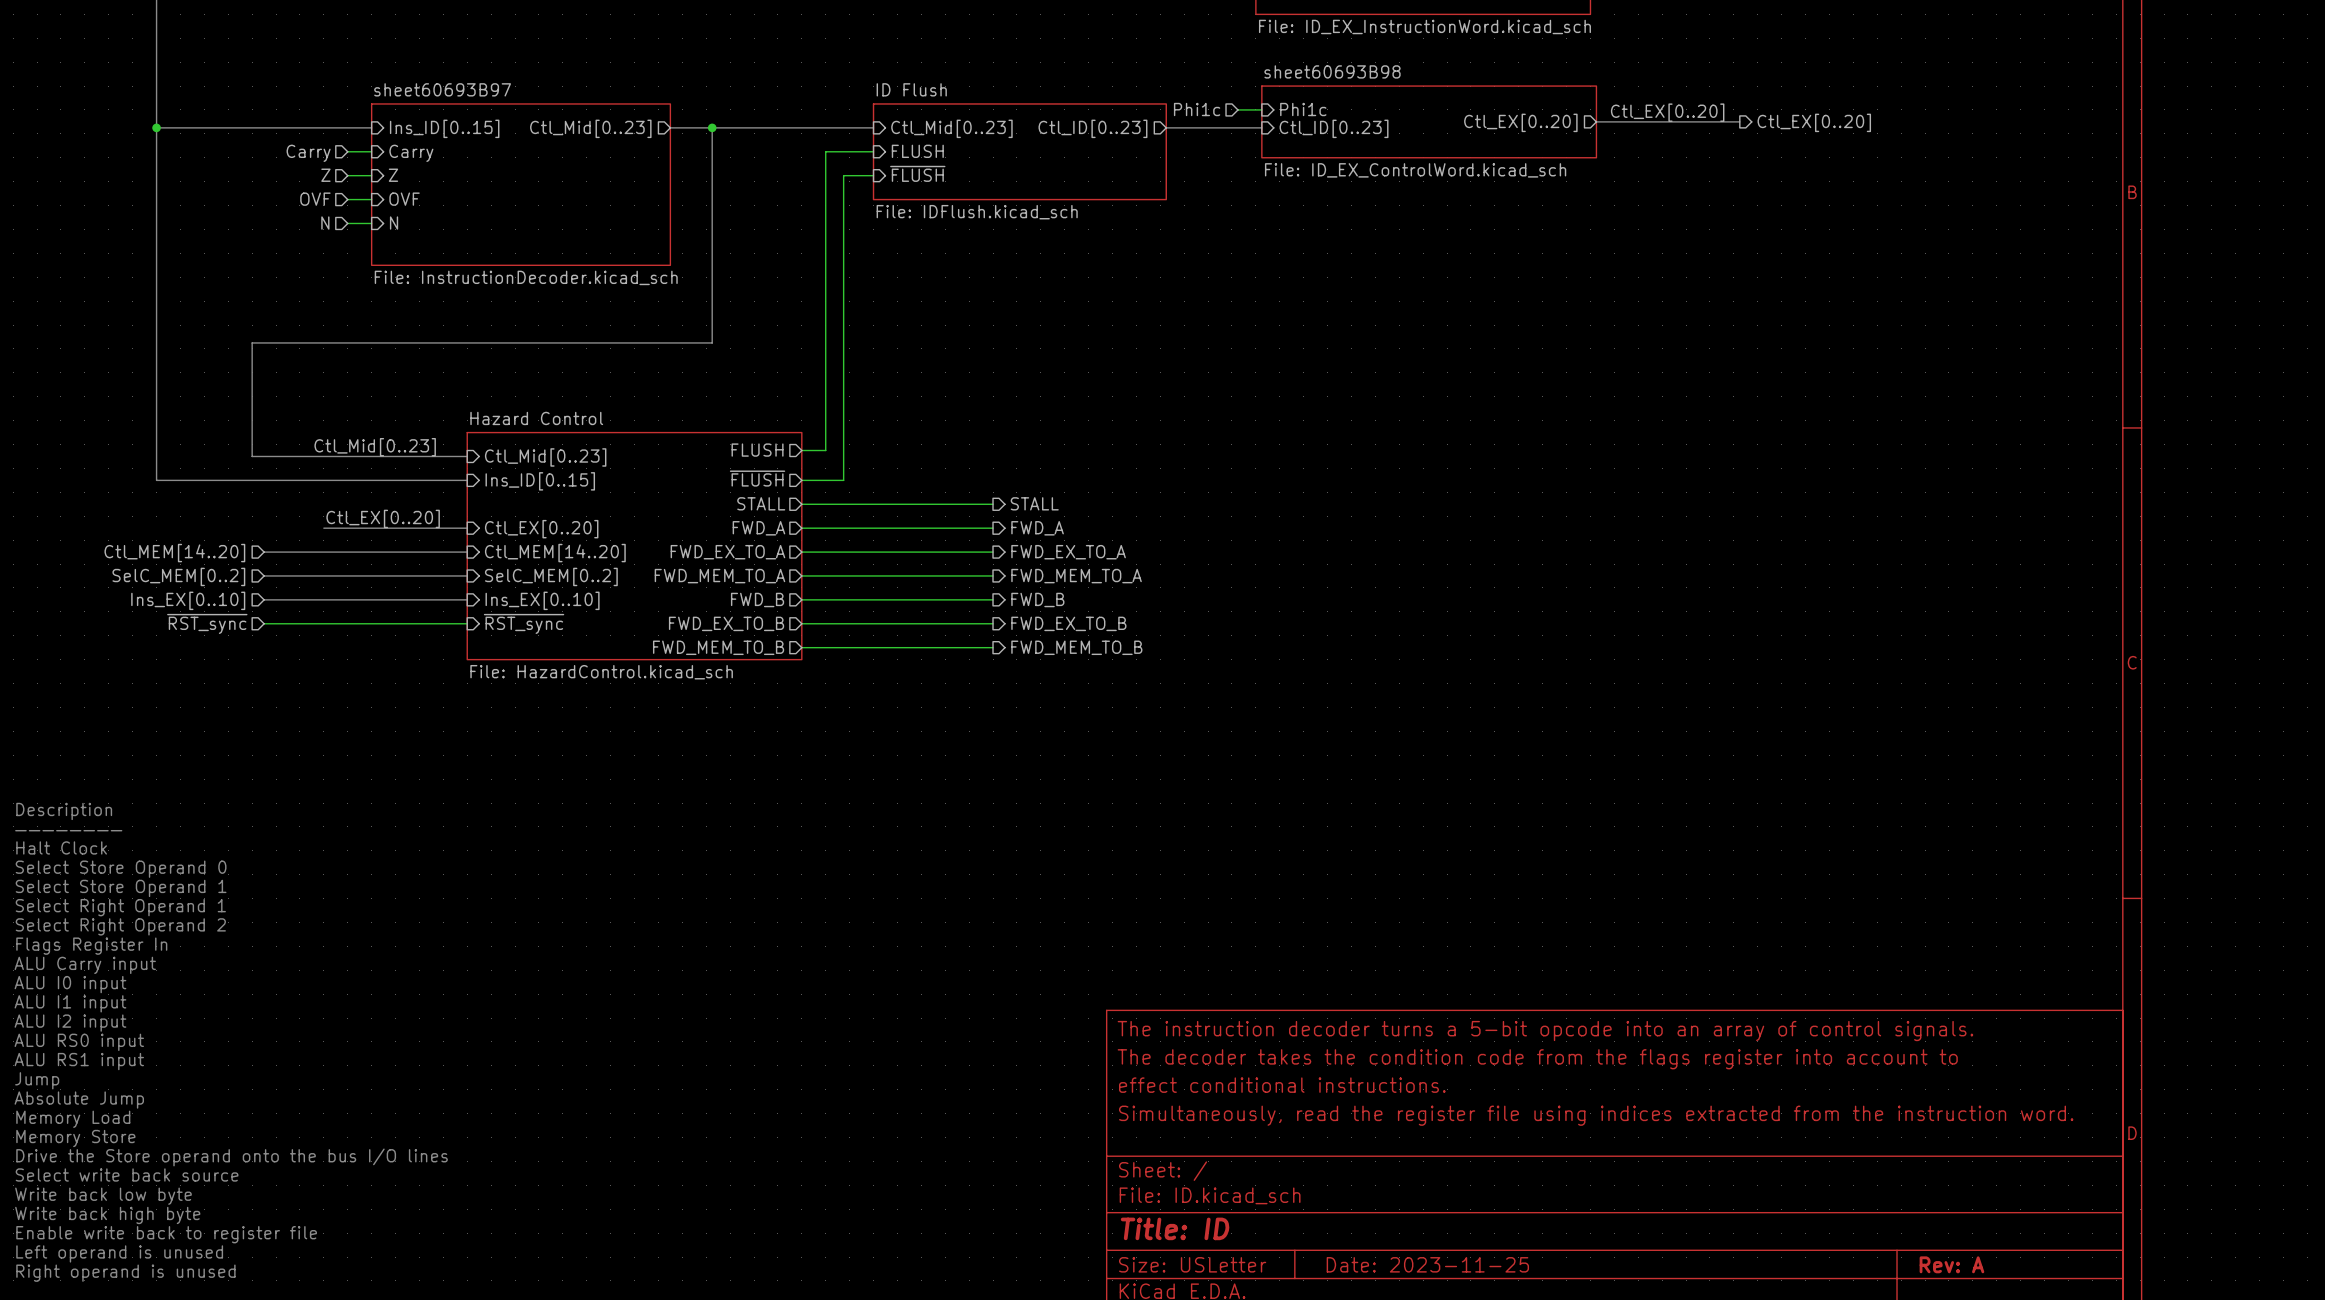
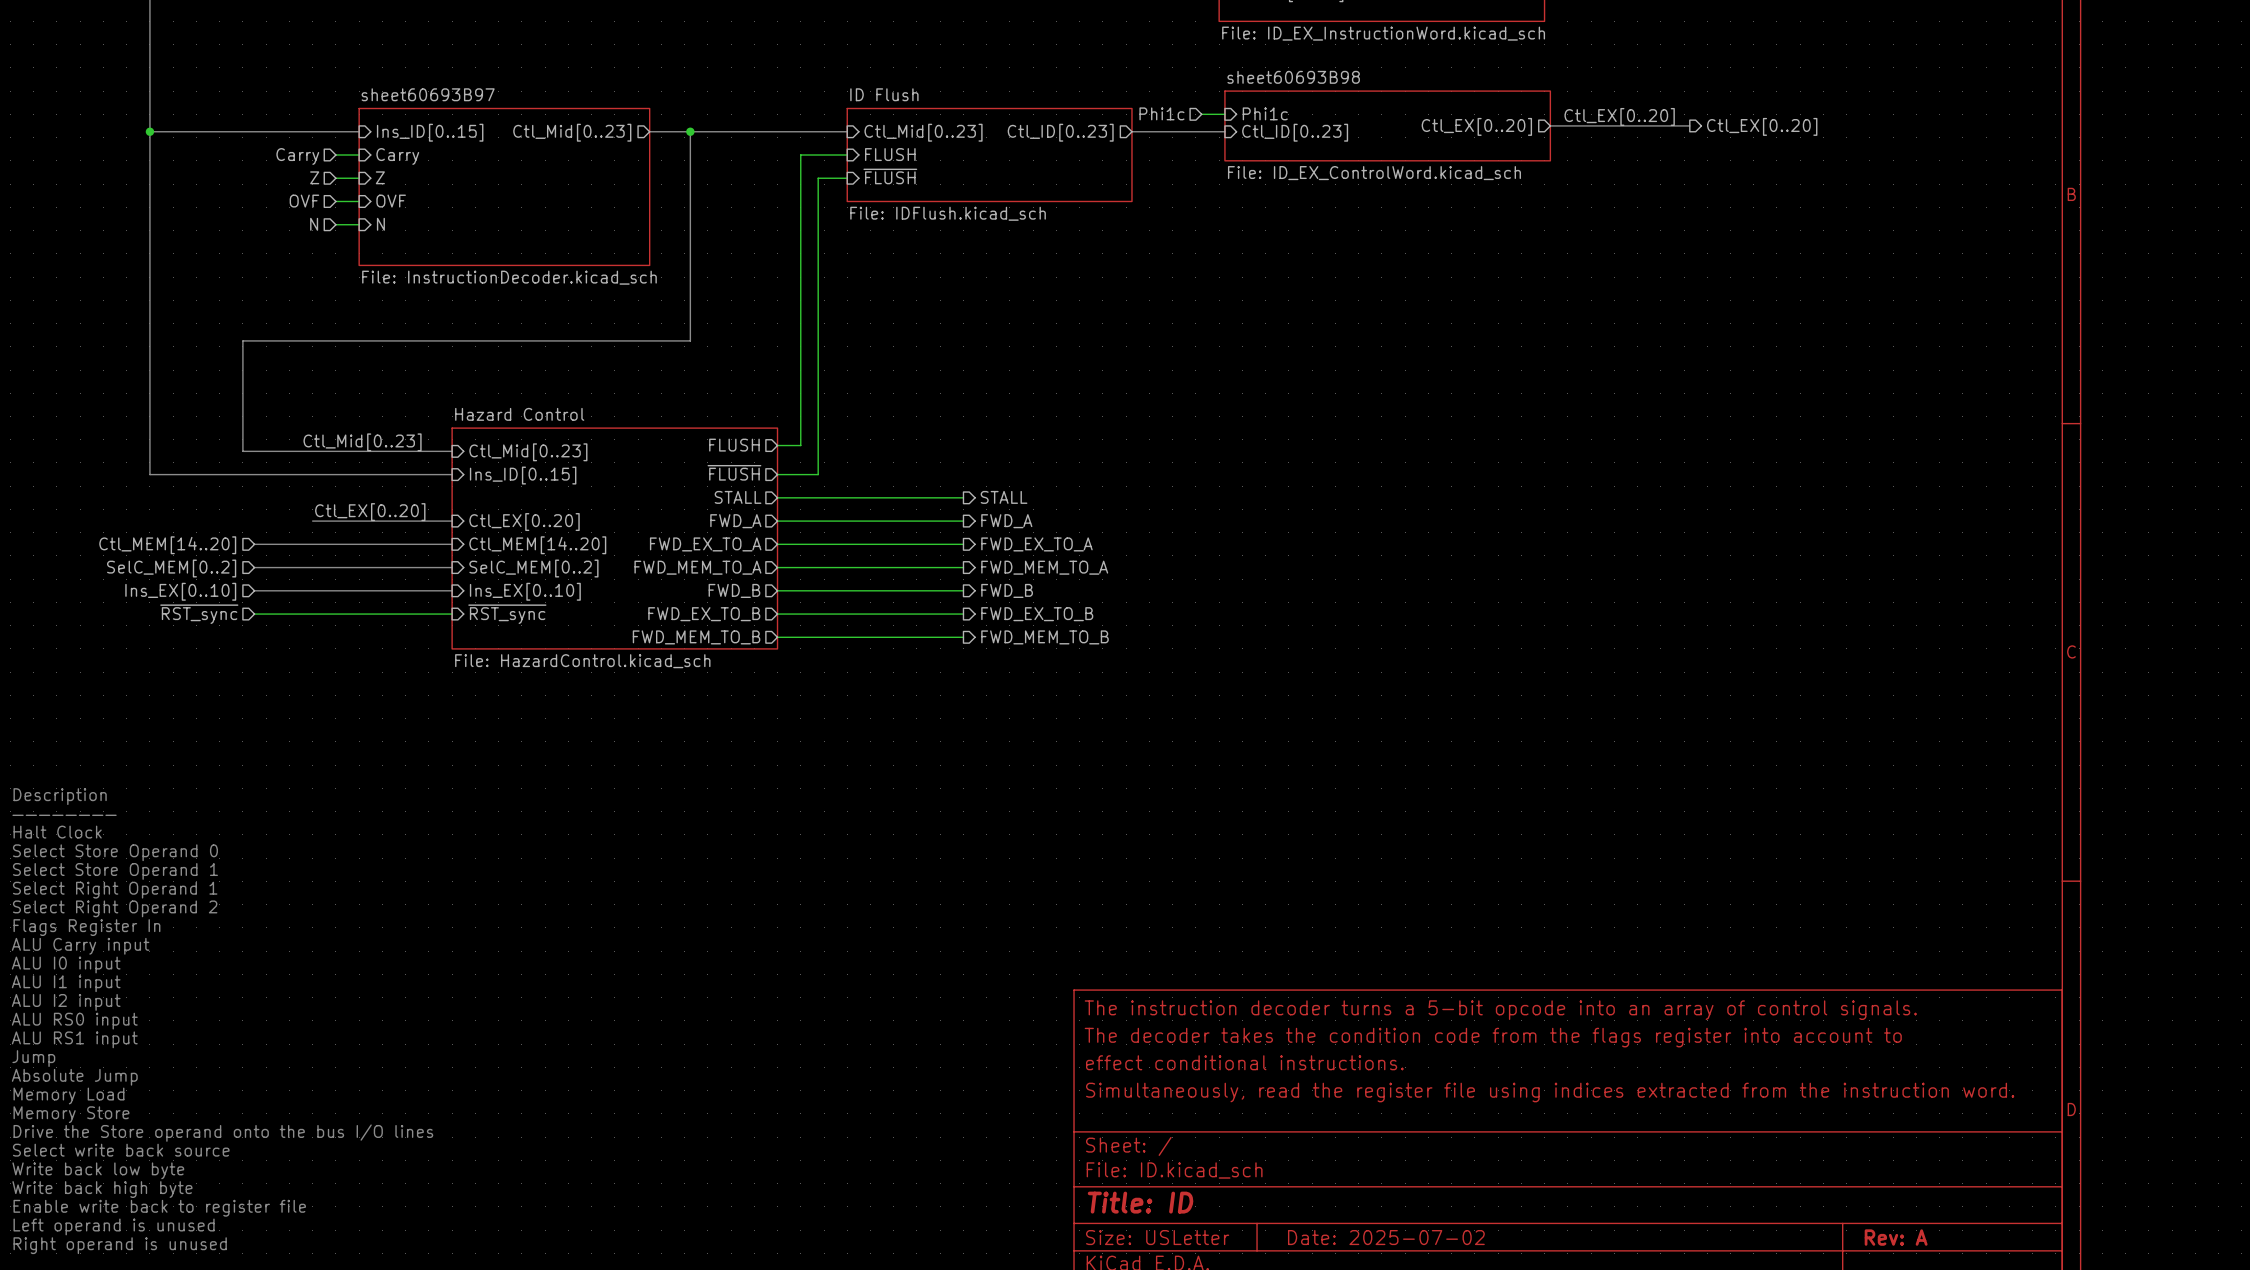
title block: Date: 2023-11-25 (1427, 1264) -> Date: 2025-07-02 (1386, 1237)

